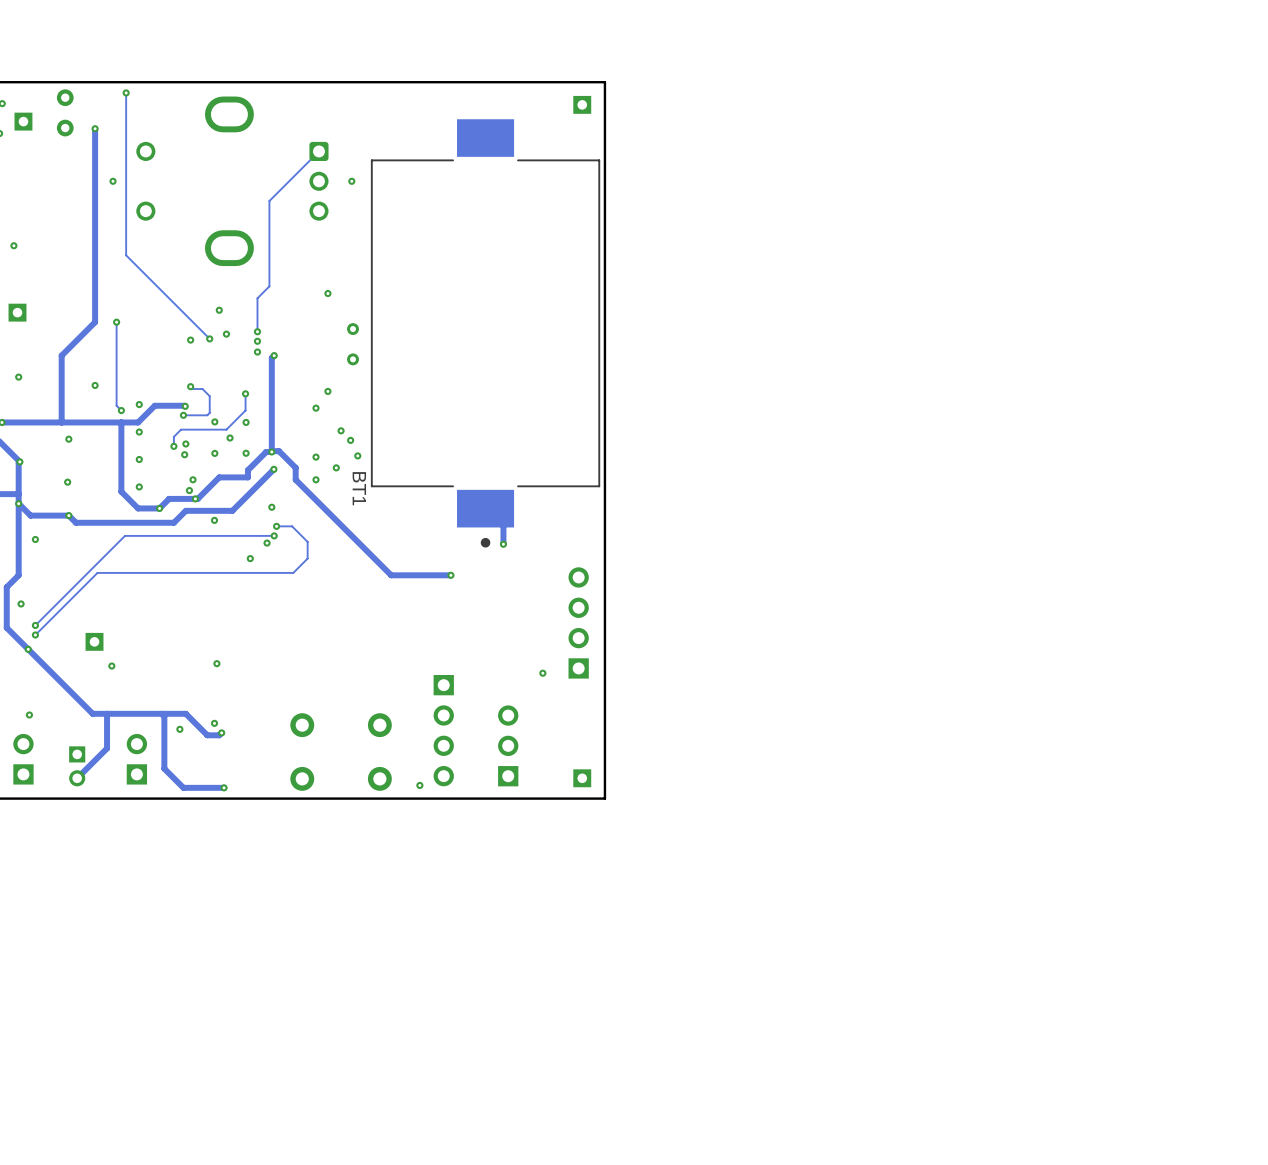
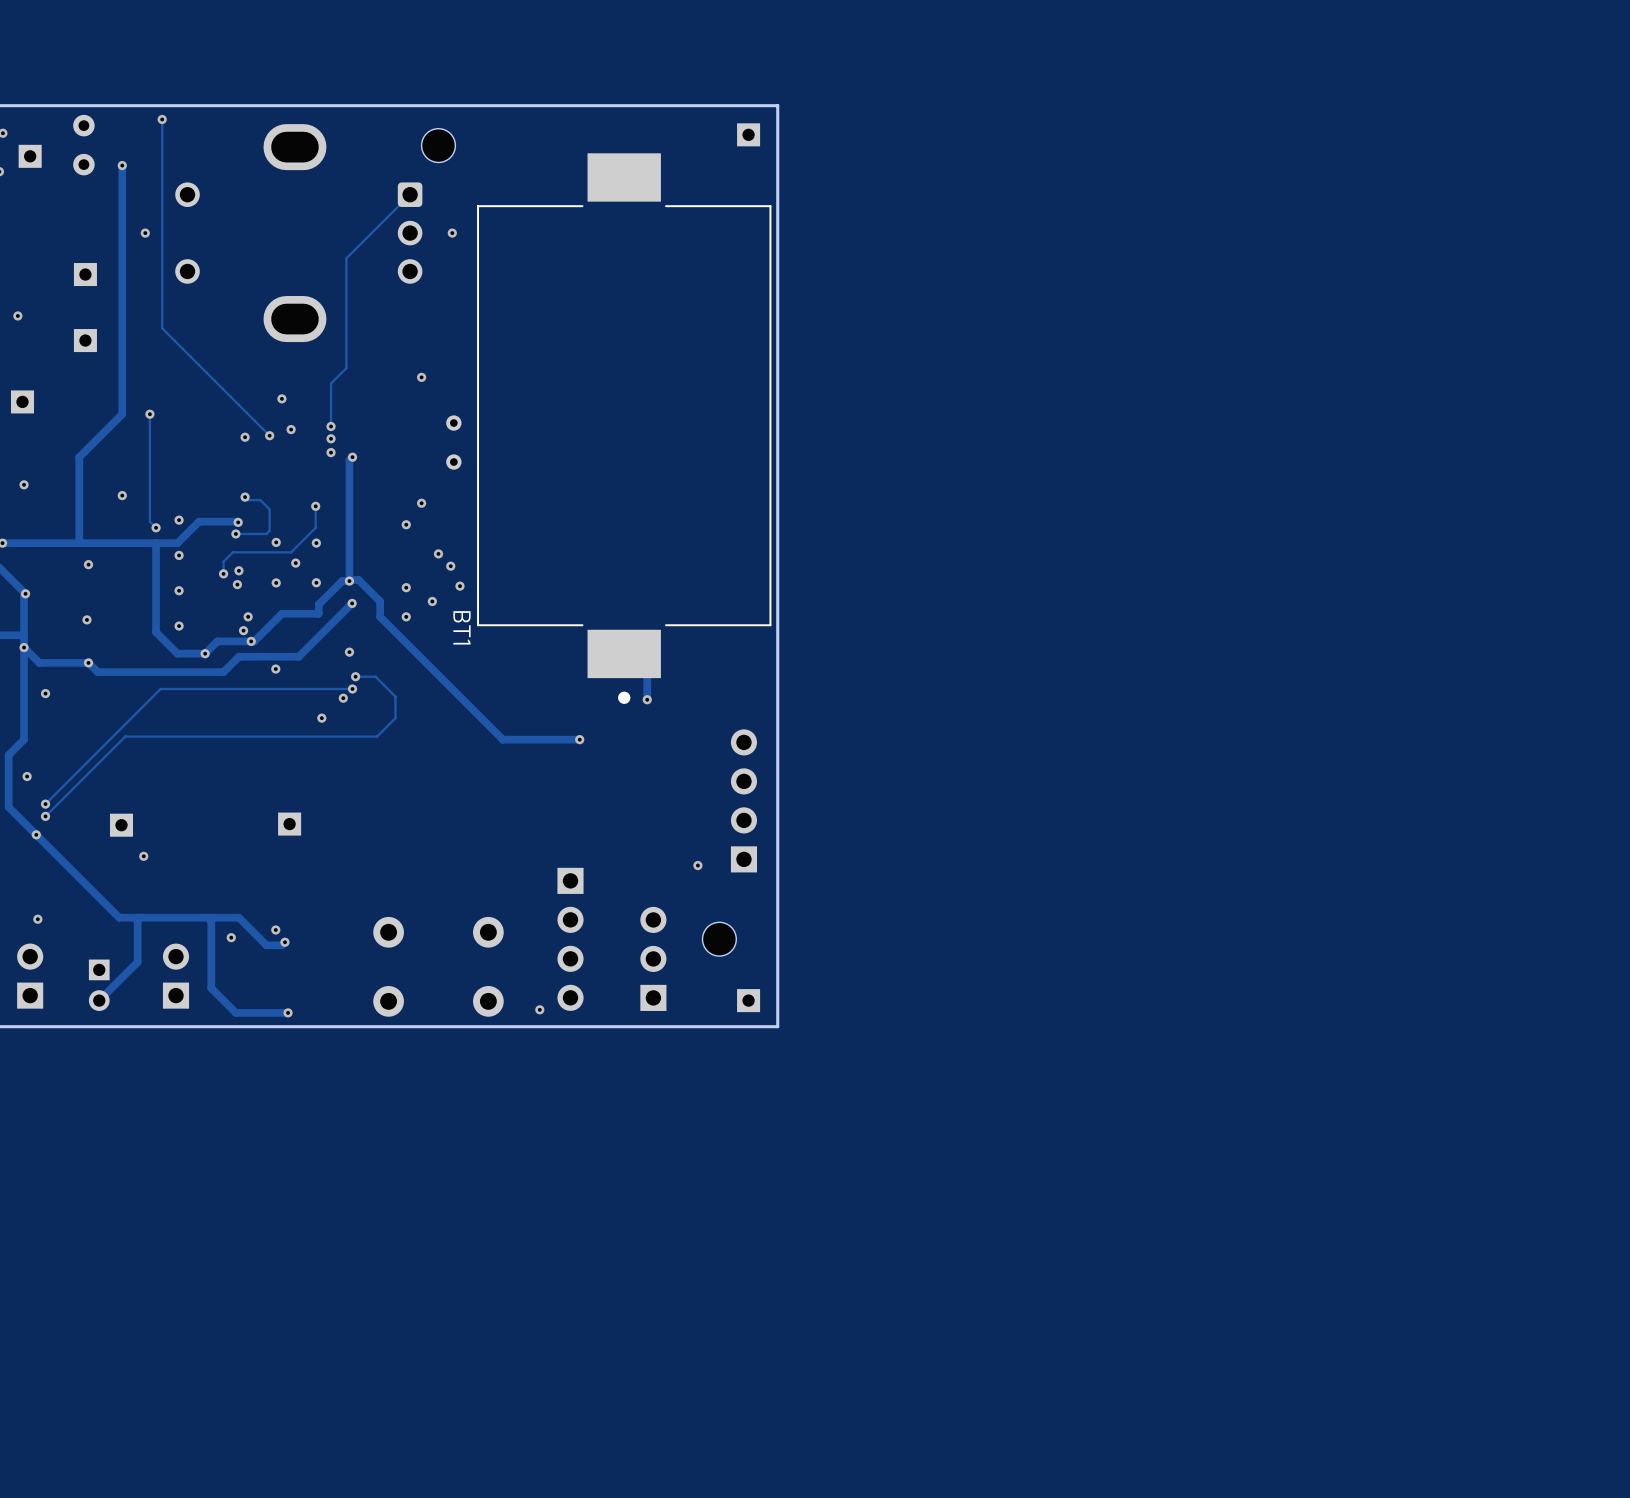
part: none -> (438, 145)
part: none -> (85, 274)
part: none -> (85, 340)
part: none -> (289, 824)
via: (216, 663) -> none
part: none -> (719, 939)

